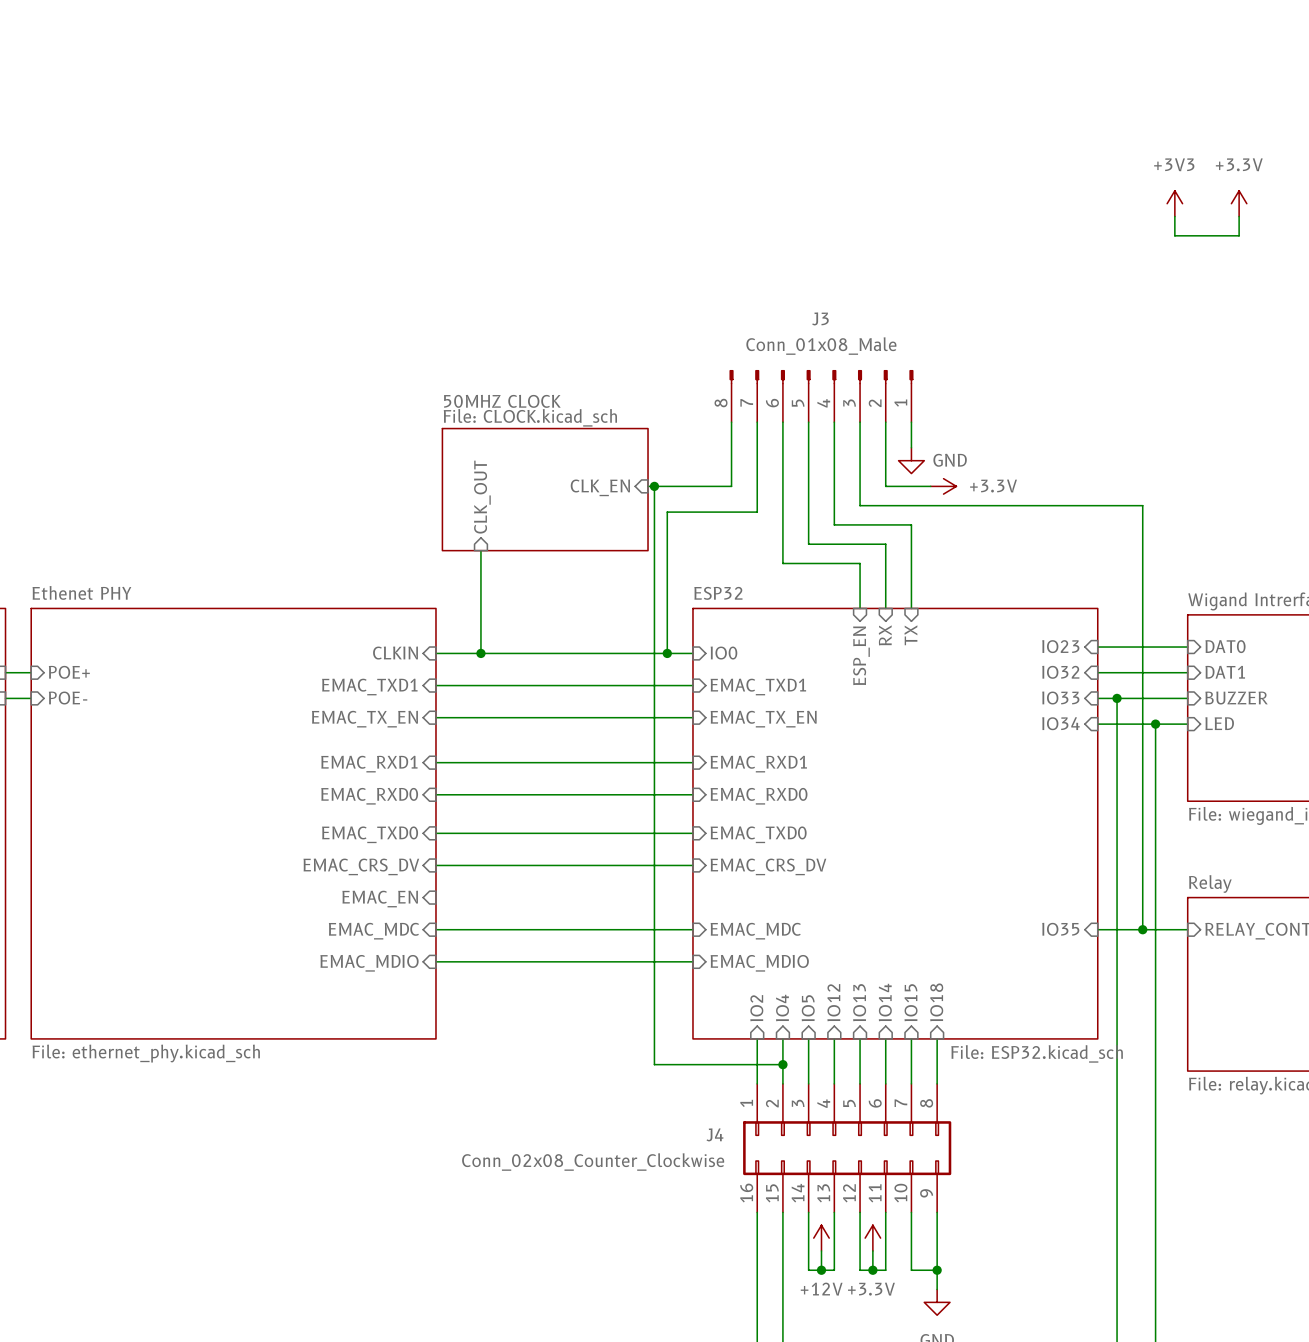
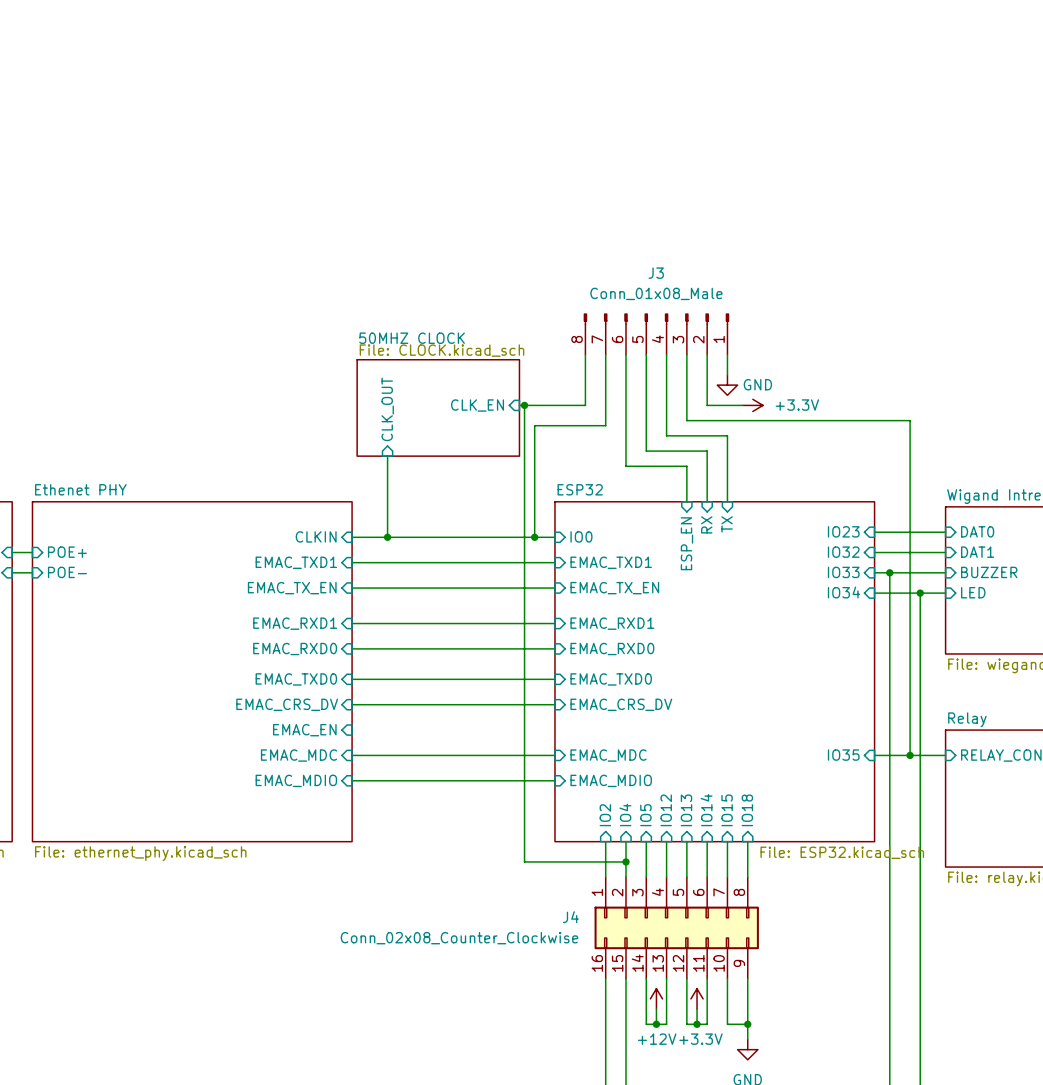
power symbol: +3V3 (1174, 203) -> none
power symbol: +3.3V (1239, 203) -> none
wire: (1174, 216) (1174, 235) (1239, 235) (1239, 216) -> none

